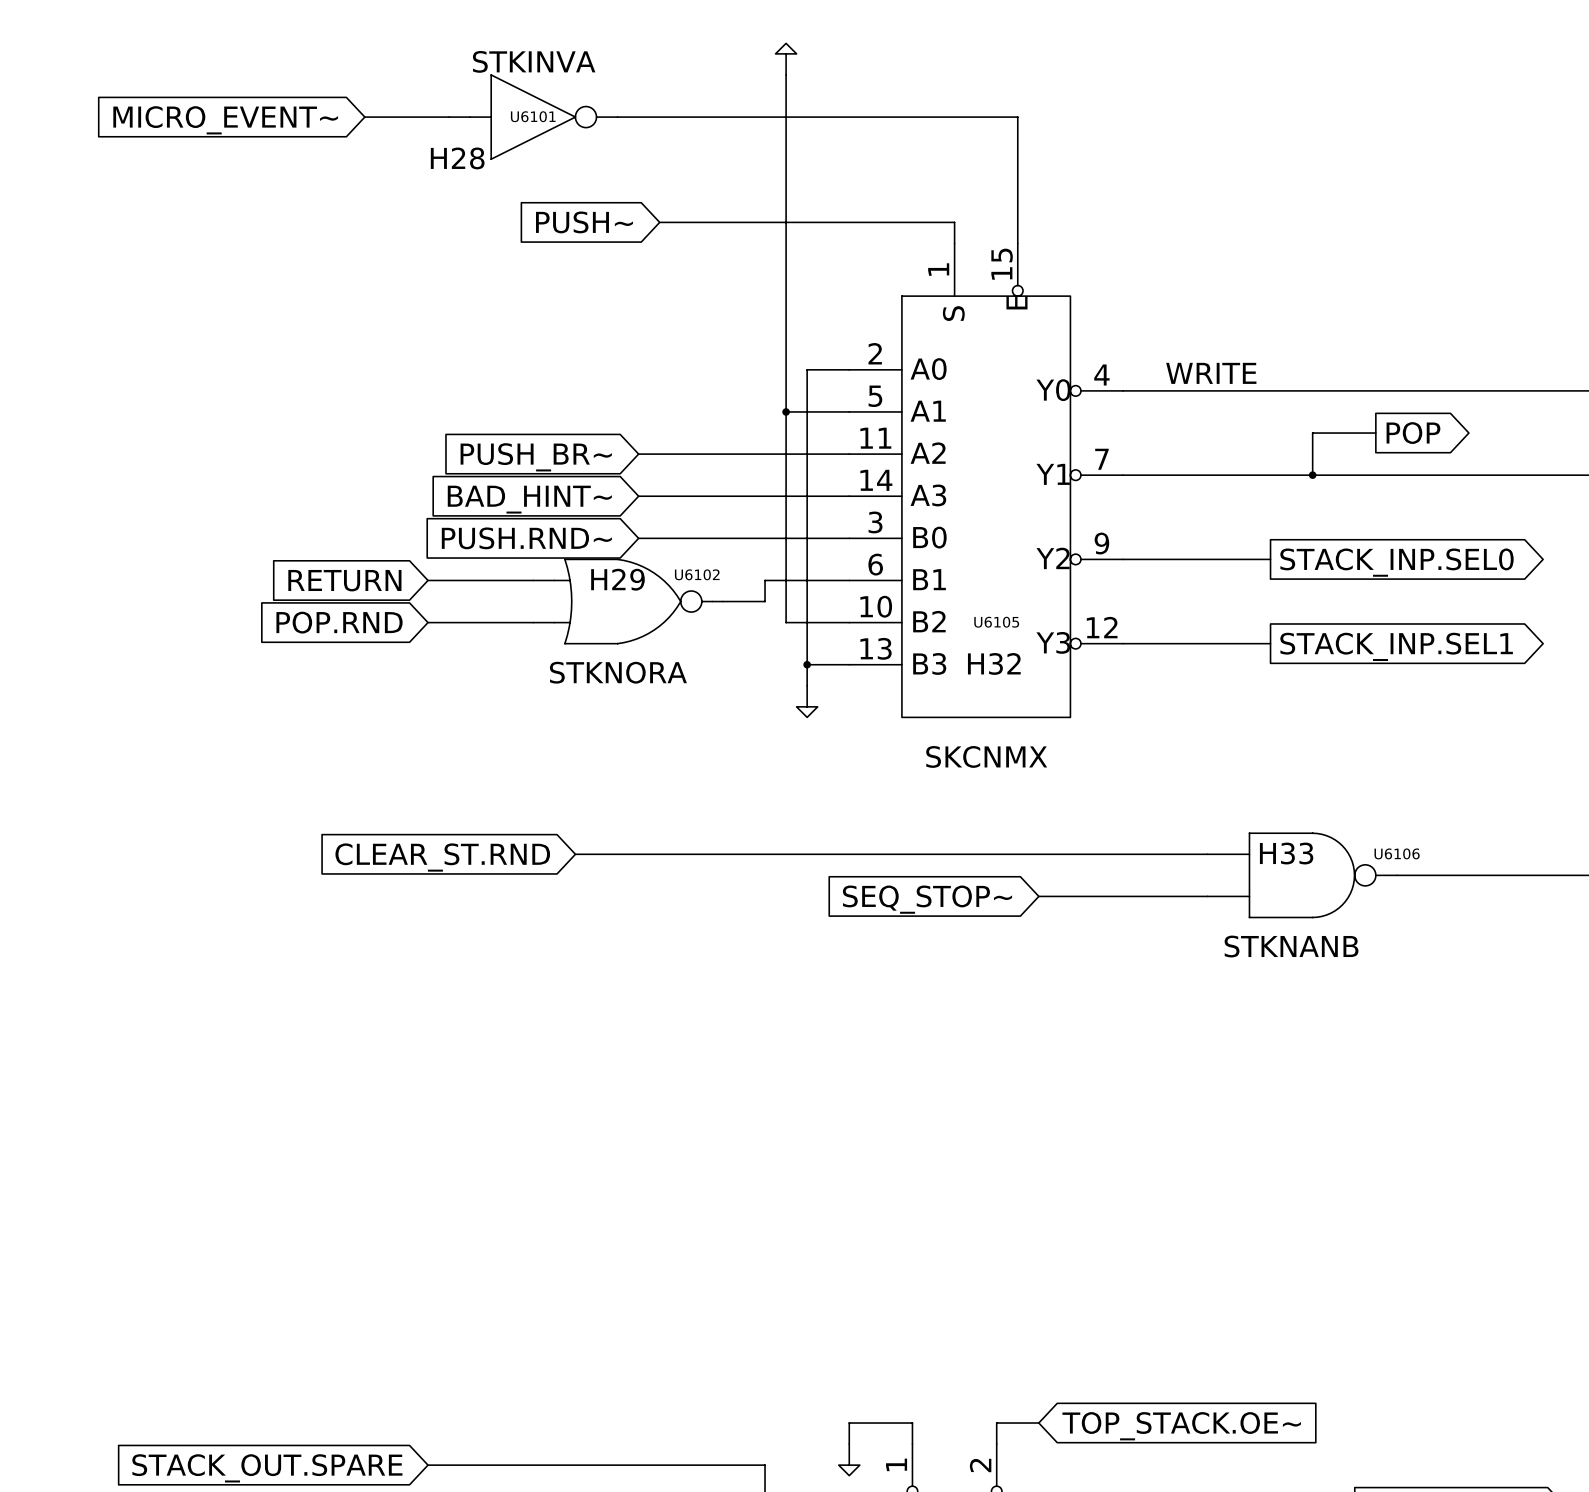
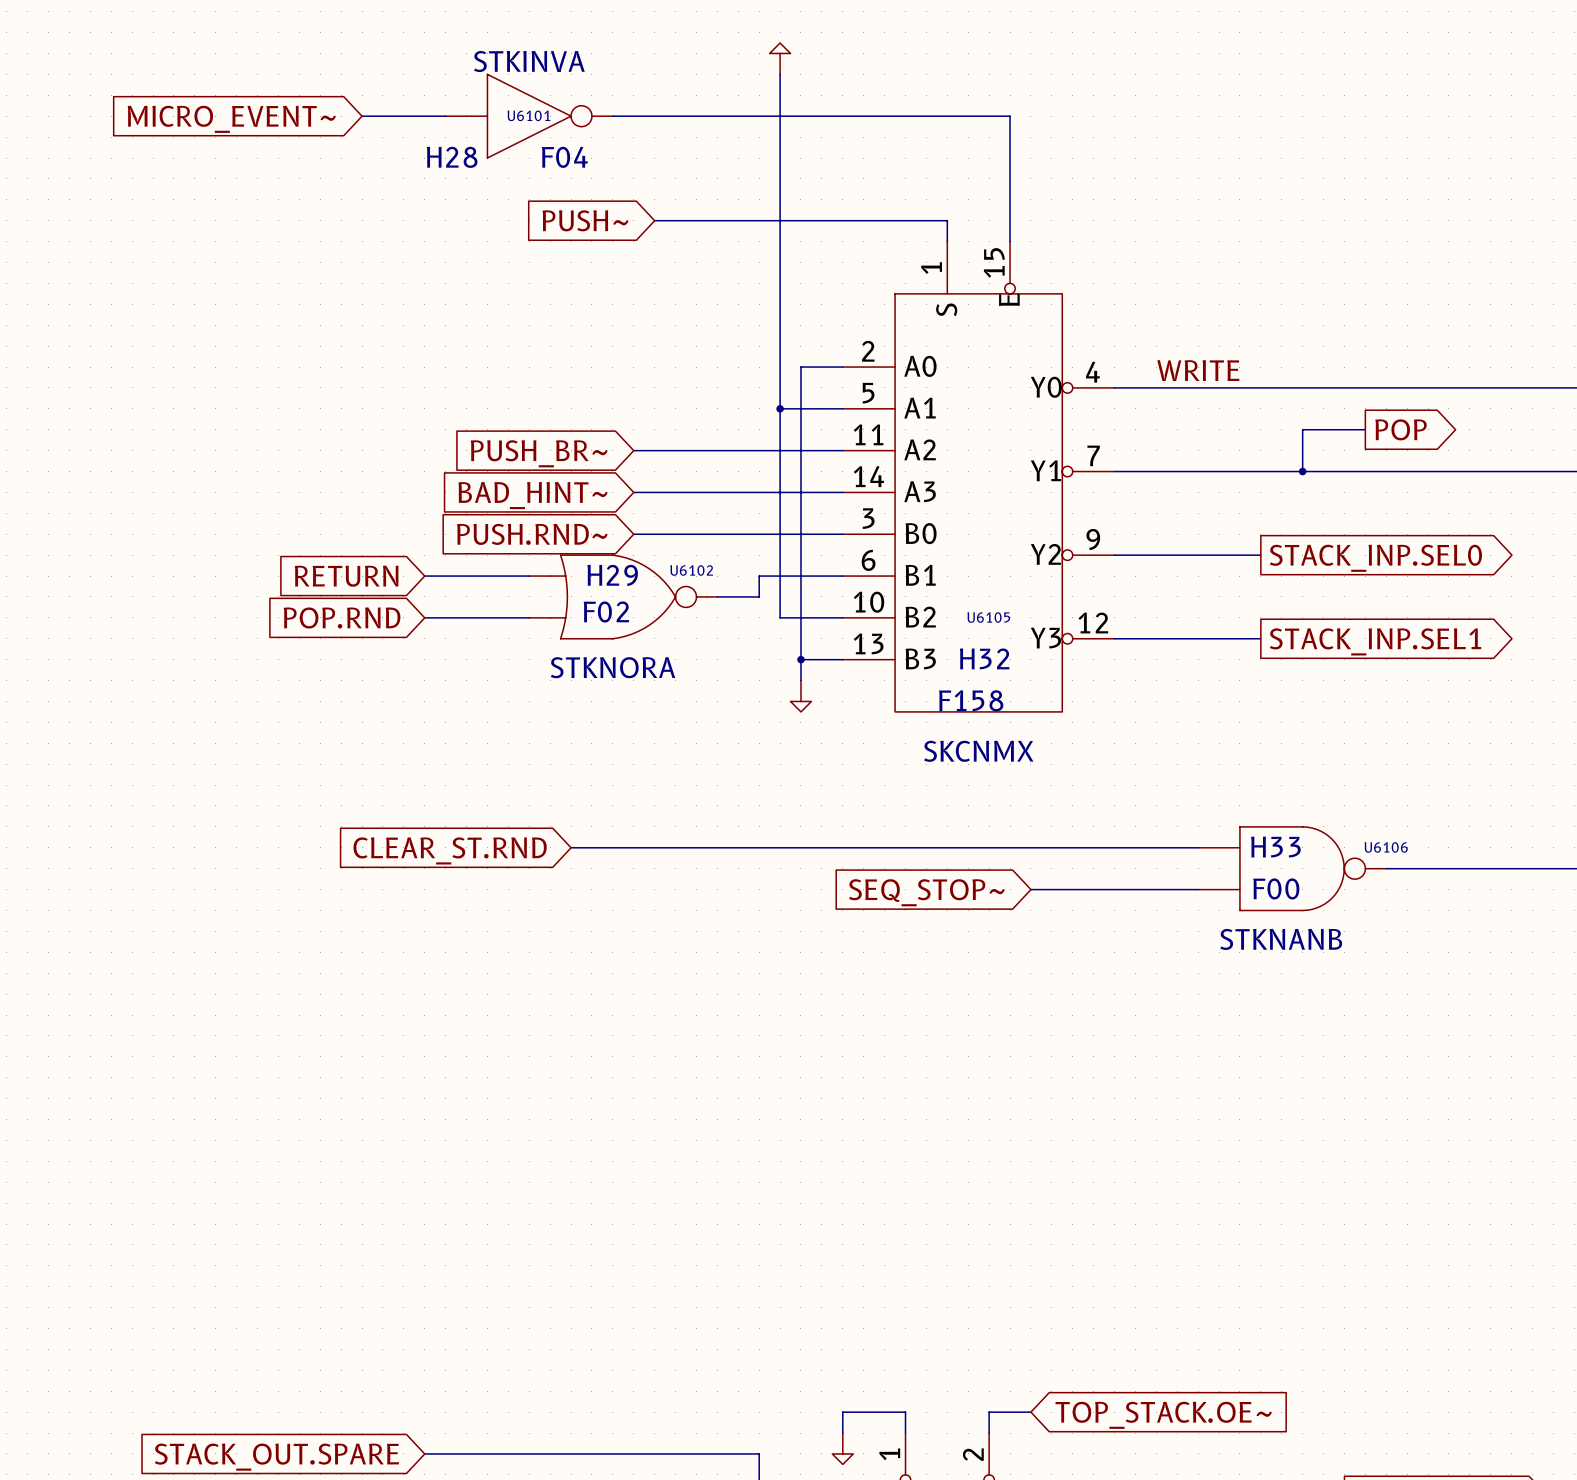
U6101 value: none -> F04 (564, 157)
U6102 value: none -> F02 (606, 611)
U6105 value: none -> F158 (971, 700)
U6106 value: none -> F00 (1276, 888)

